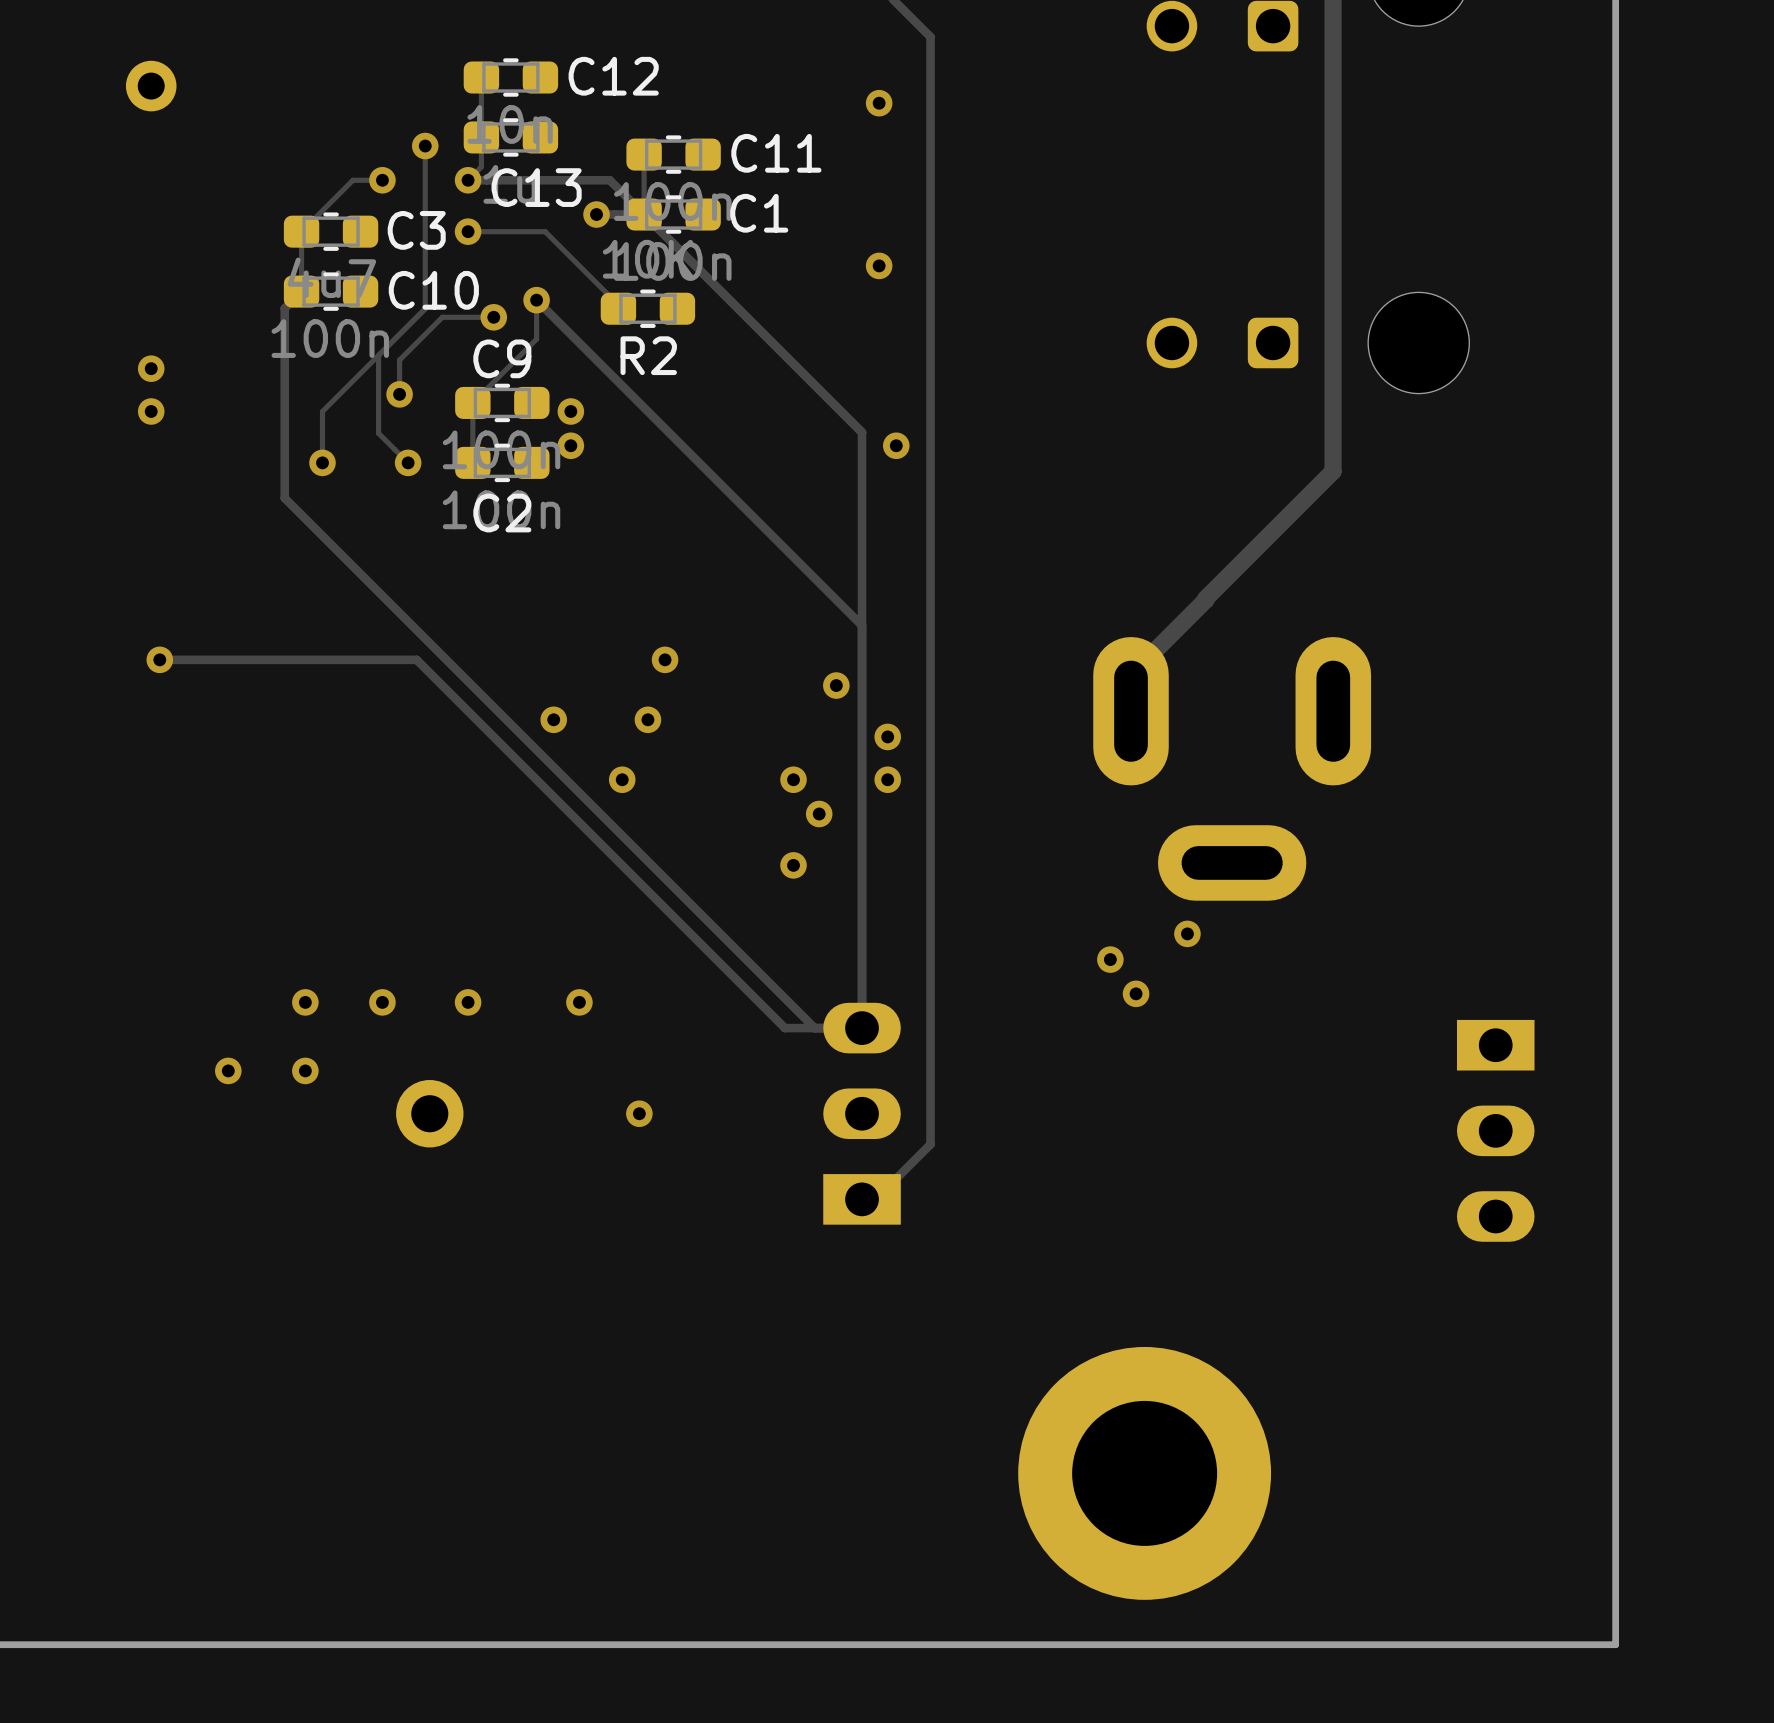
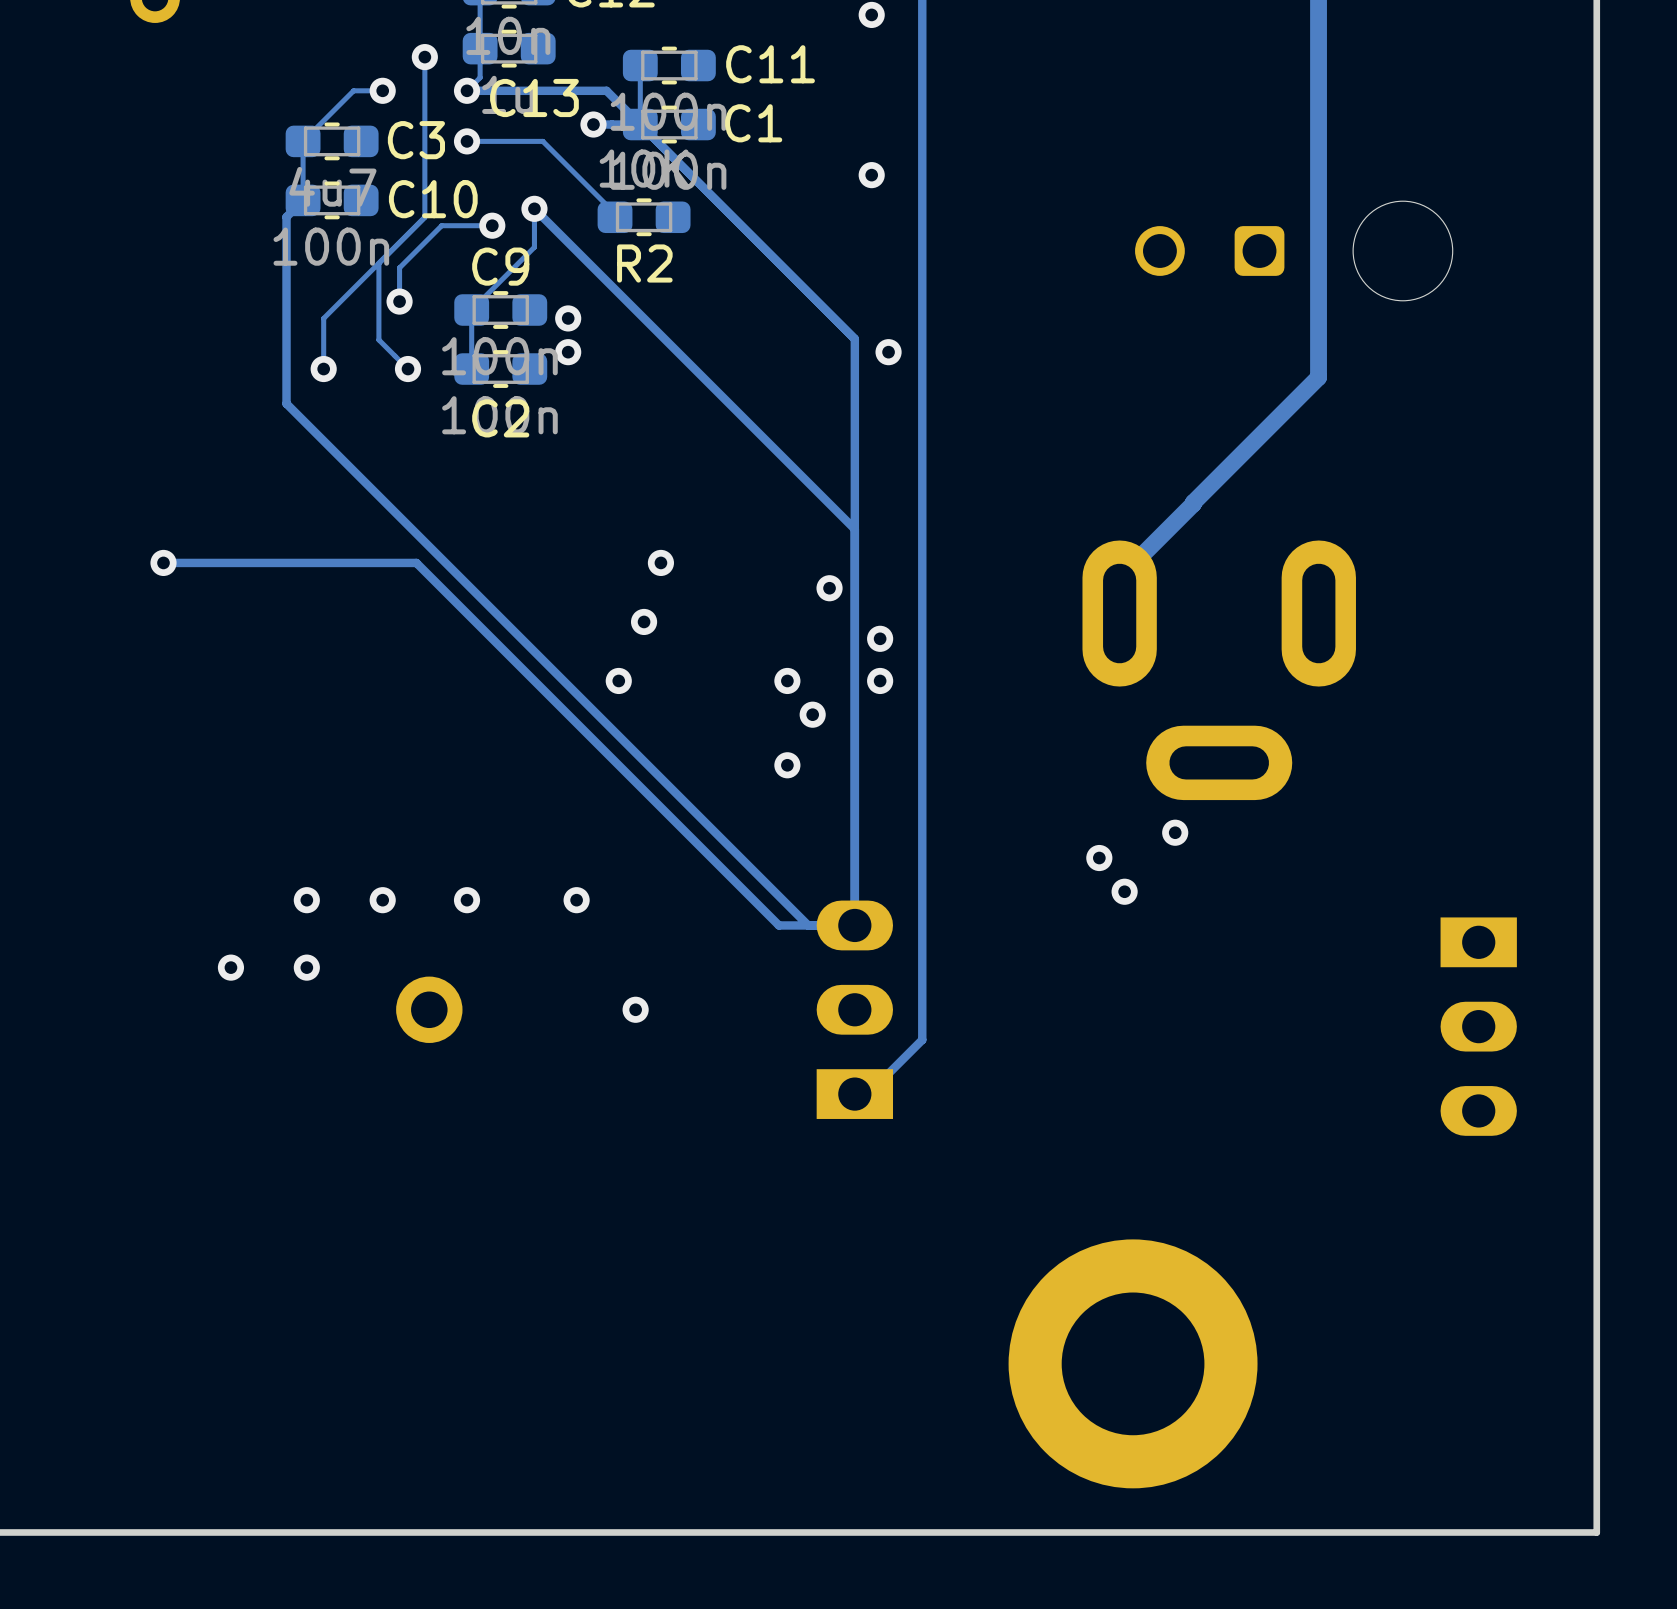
via: (151, 368) -> none
via: (151, 411) -> none
via: (553, 719) -> none

